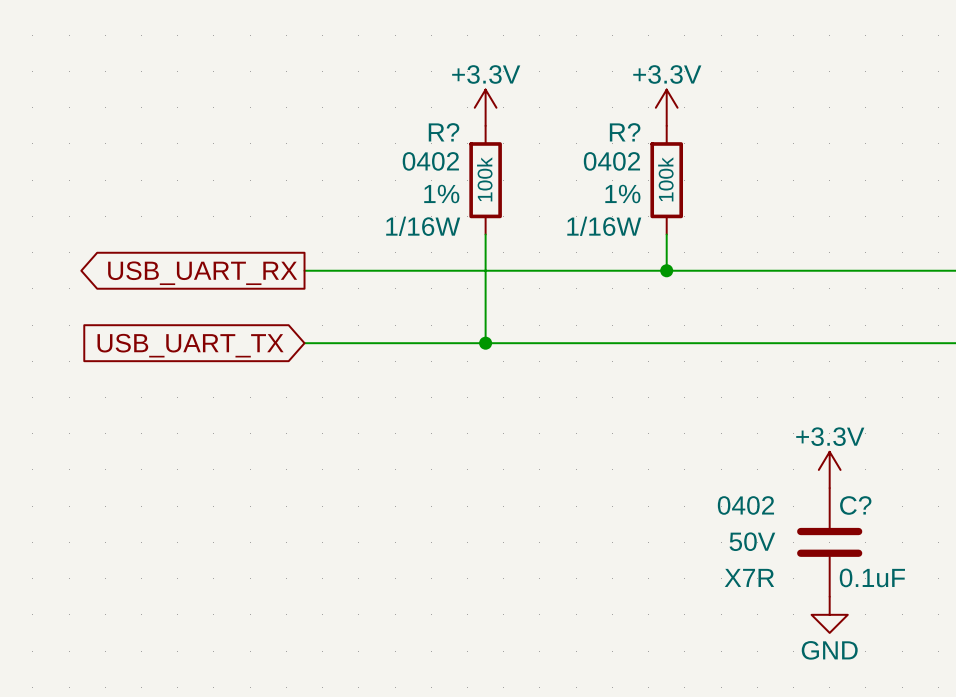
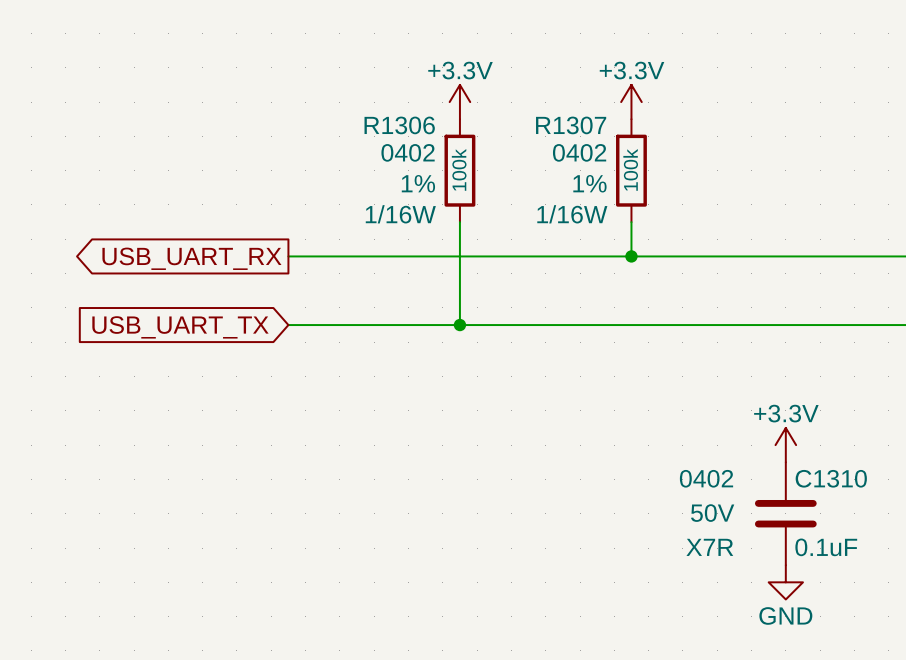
R? name: R? (444, 132) -> R1306 (399, 125)
R? name: R? (625, 132) -> R1307 (571, 125)
C? name: C? (855, 505) -> C1310 (831, 478)

